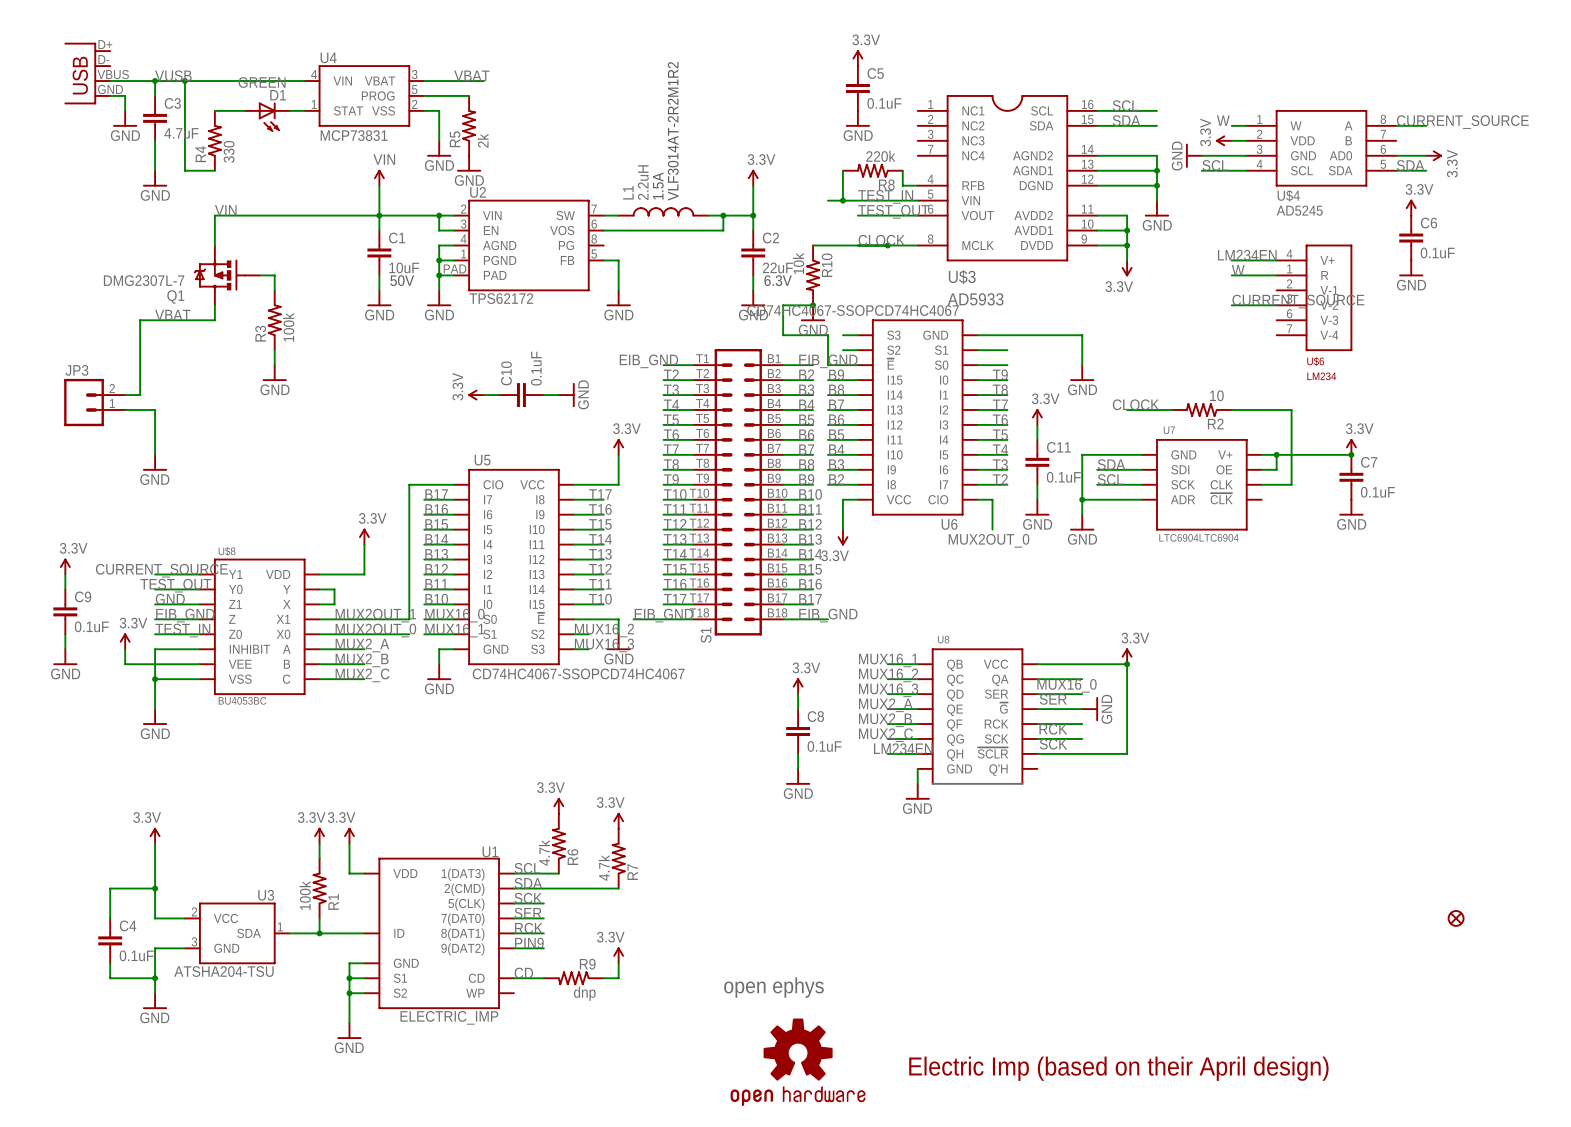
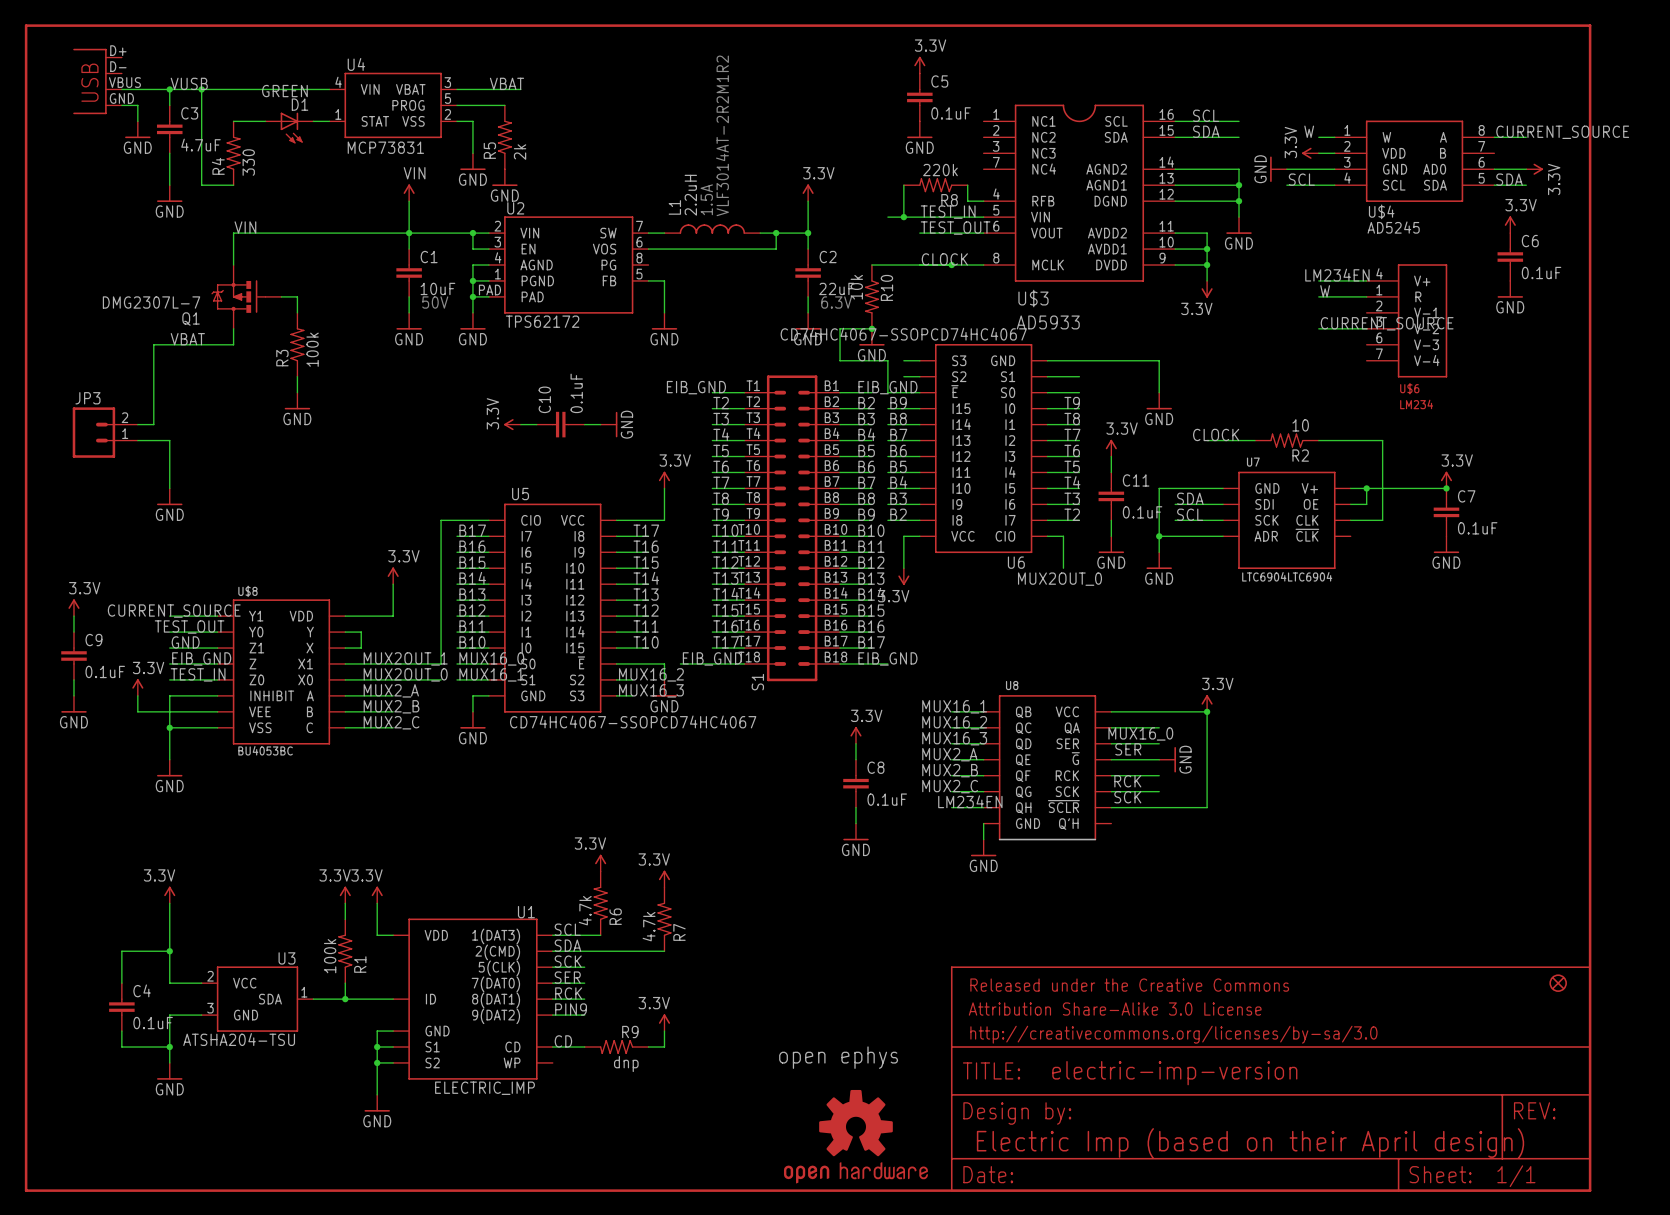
part: none -> (808, 608)
part: none -> (1270, 1078)

